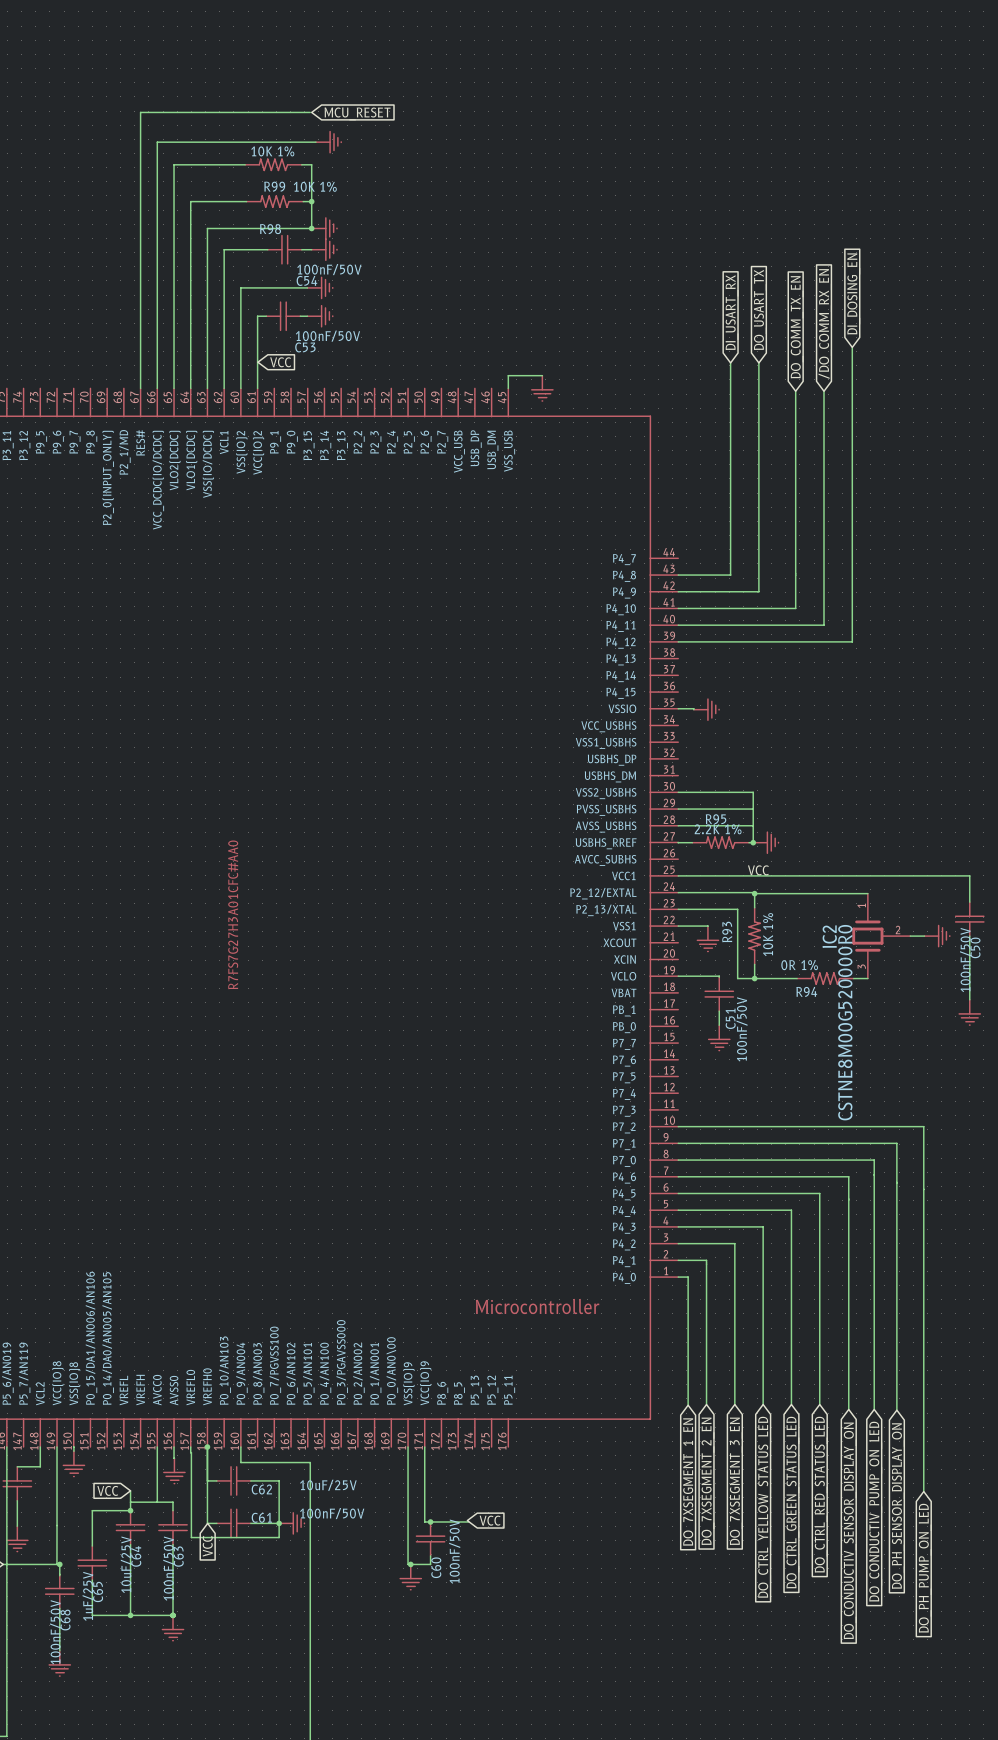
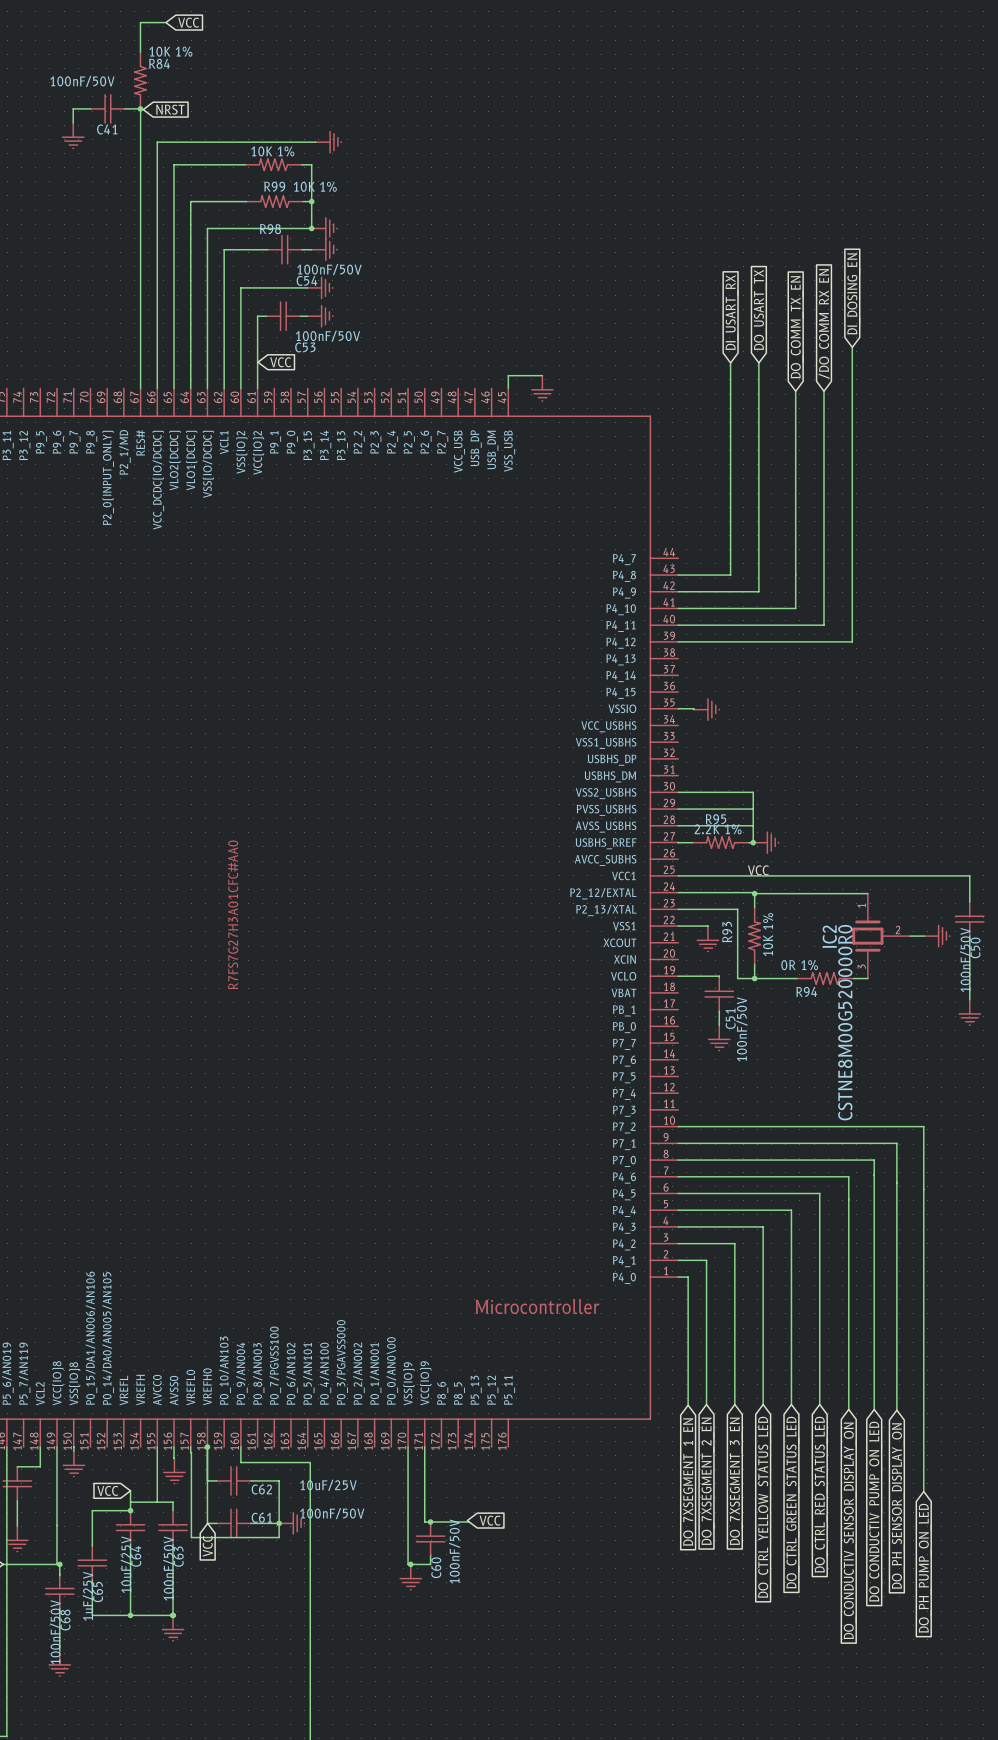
wire: none -> (165, 22) (140, 22) (140, 52)
global label: none -> VCC (188, 22)
R84: none -> 10K 1% (140, 80)
wire: none -> (90, 108) (73, 108) (73, 123)
C41: none -> 100nF/50V (107, 108)
junction: none -> (140, 108)
global label: none -> NRST (170, 109)
wire: (140, 112) (310, 112) -> (140, 112) (140, 108) (124, 108)
global label: MCU_RESET (357, 113) -> none
power symbol: none -> (73, 136)

